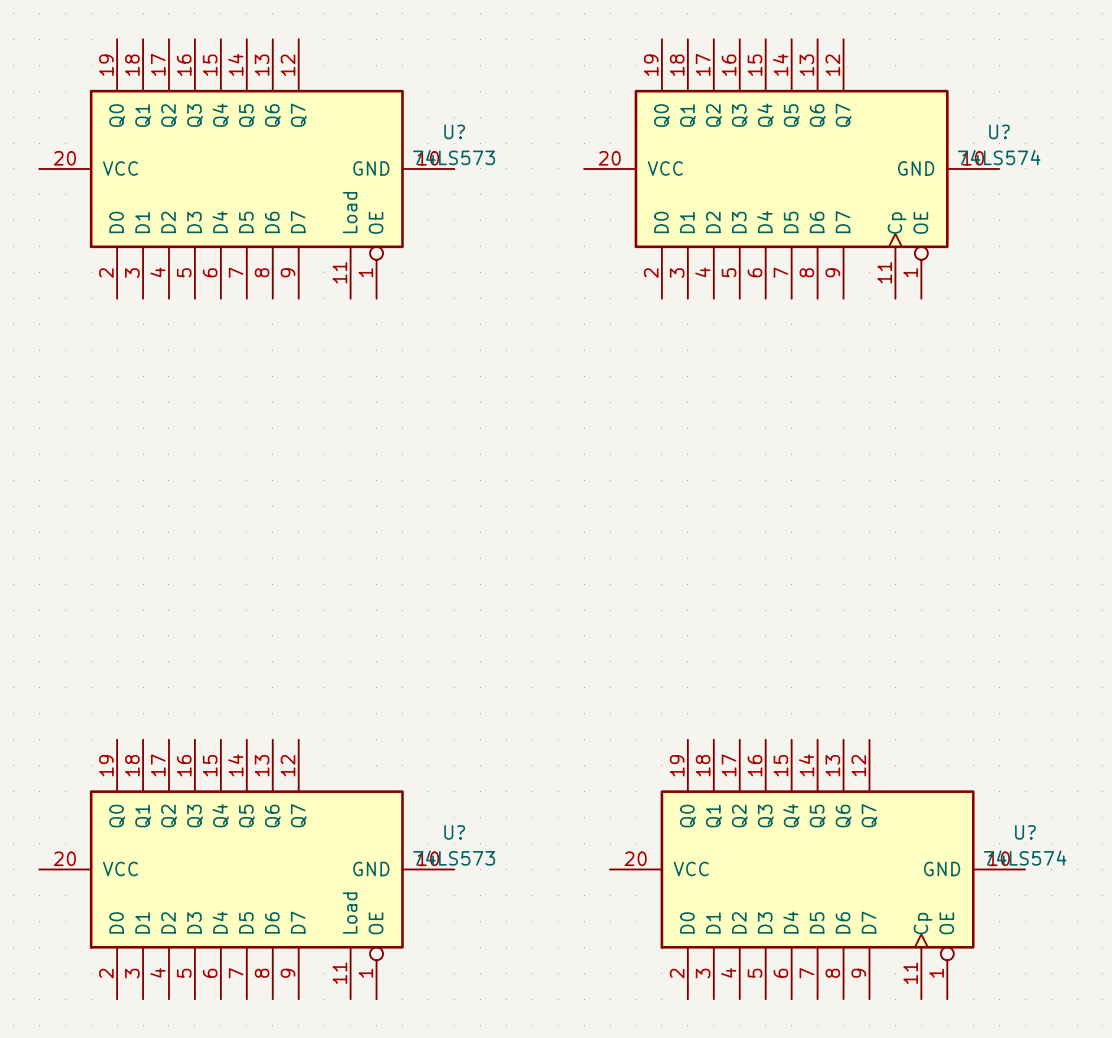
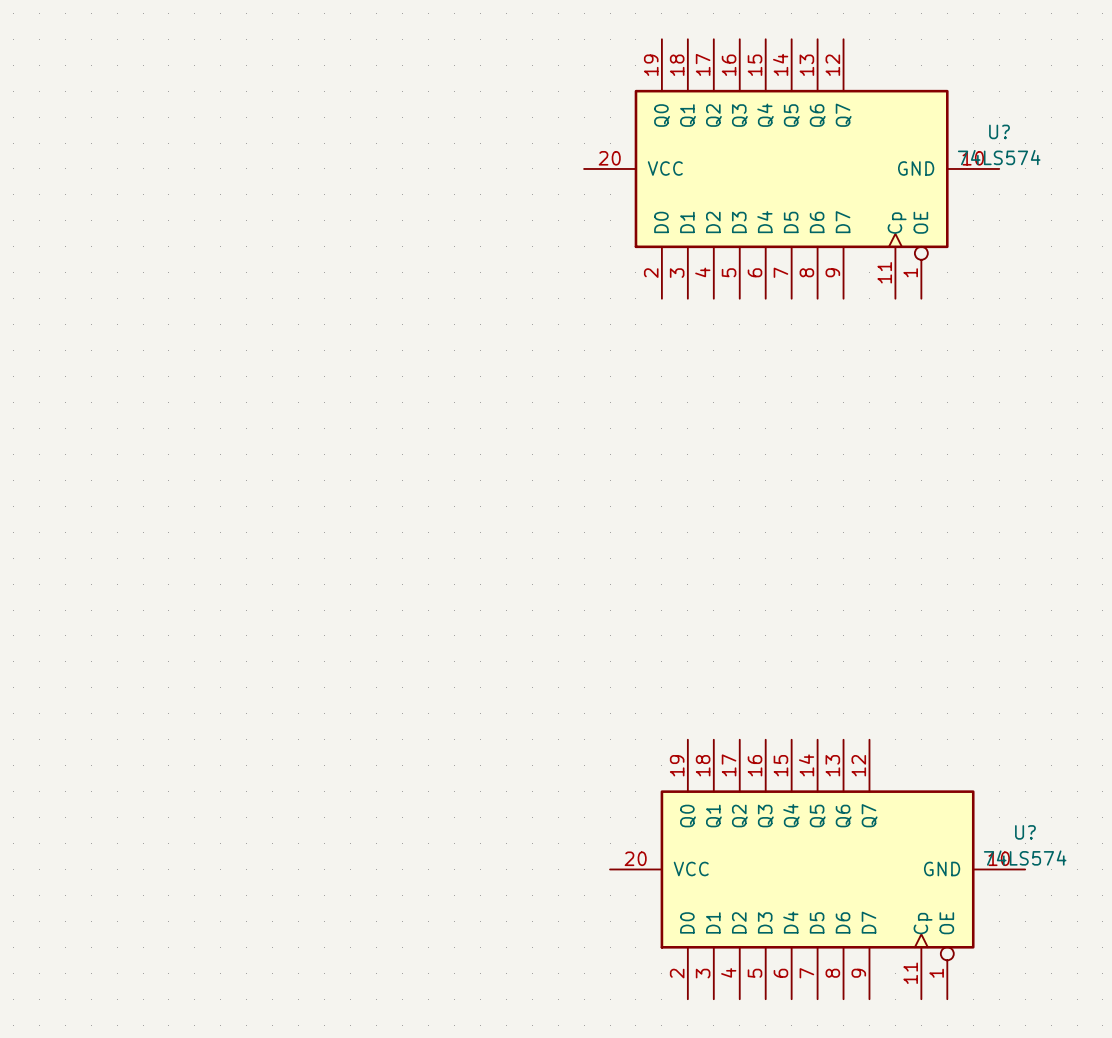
U?: 74LS573 (246, 168) -> none
U?: 74LS573 (246, 869) -> none

